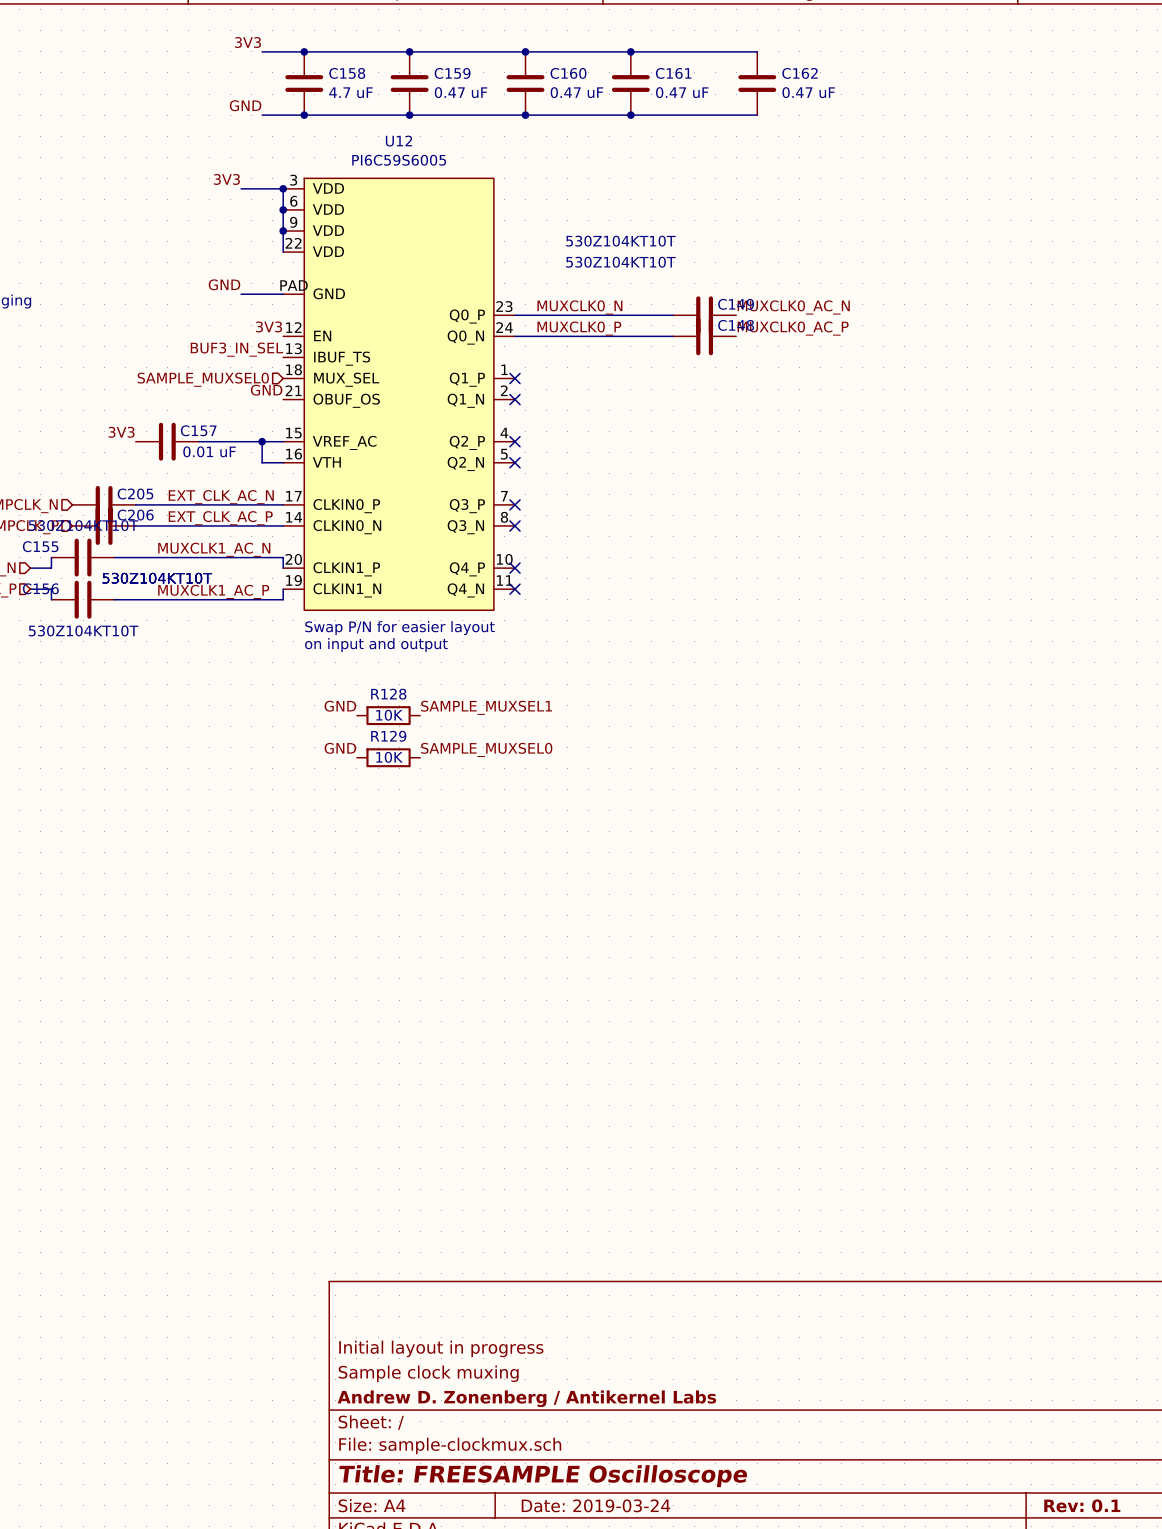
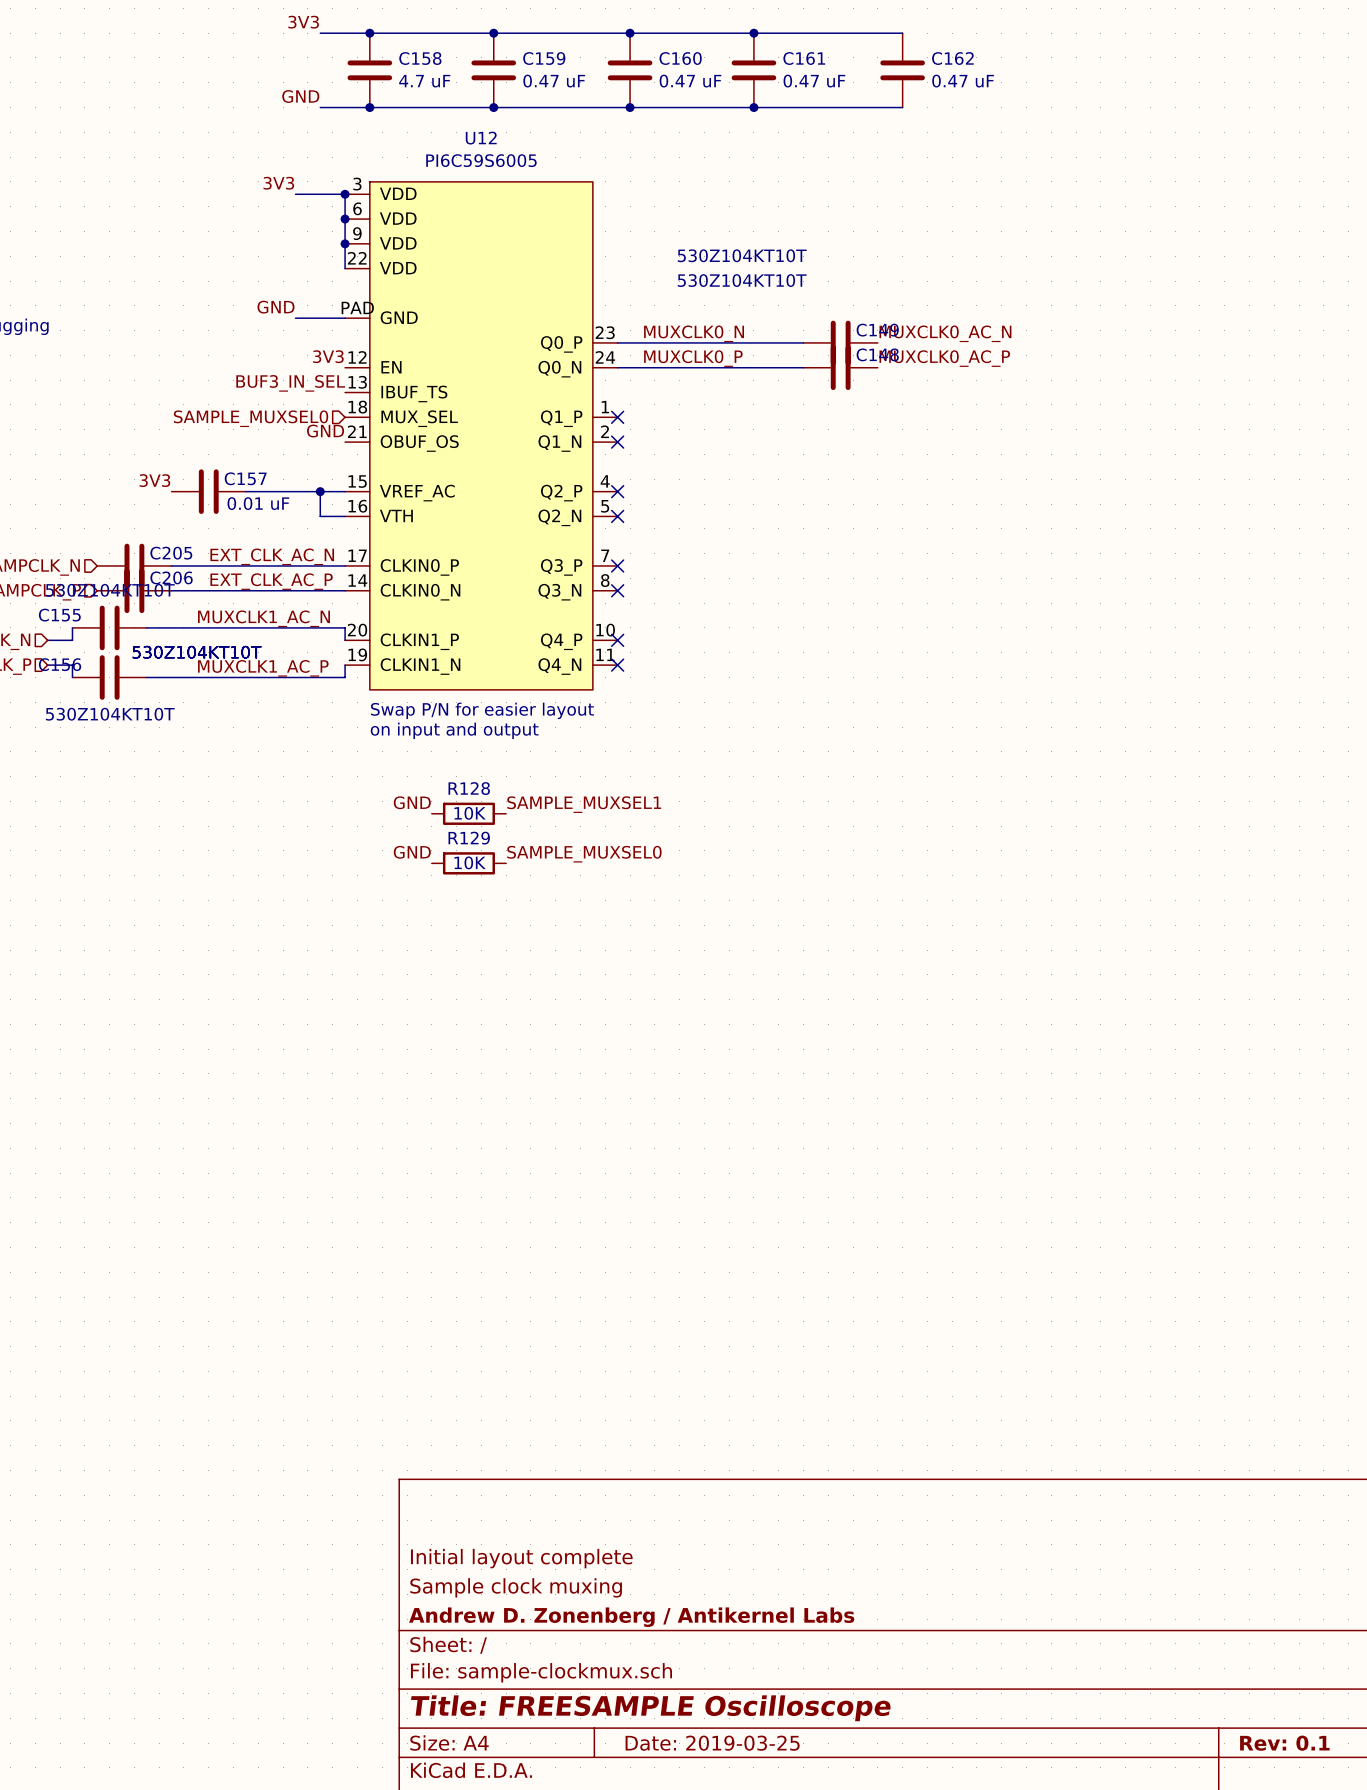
title block: Initial layout in progress (441, 1348) -> Initial layout complete (521, 1558)
title block: Date: 2019-03-24 (595, 1505) -> Date: 2019-03-25 (712, 1743)

